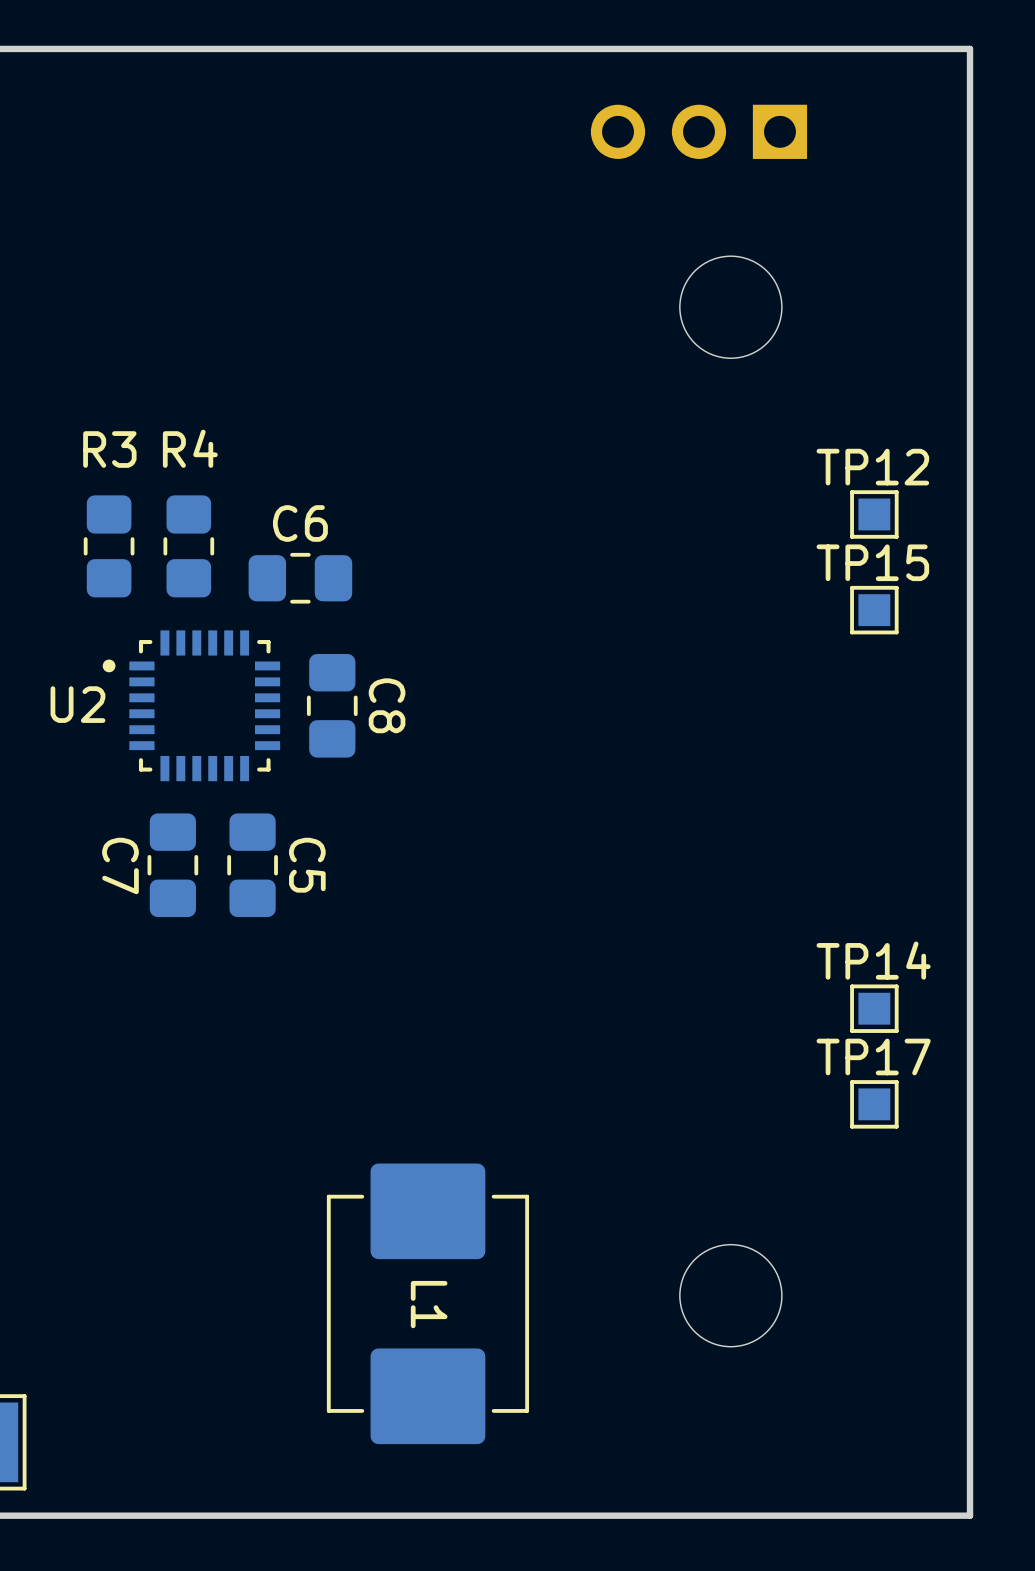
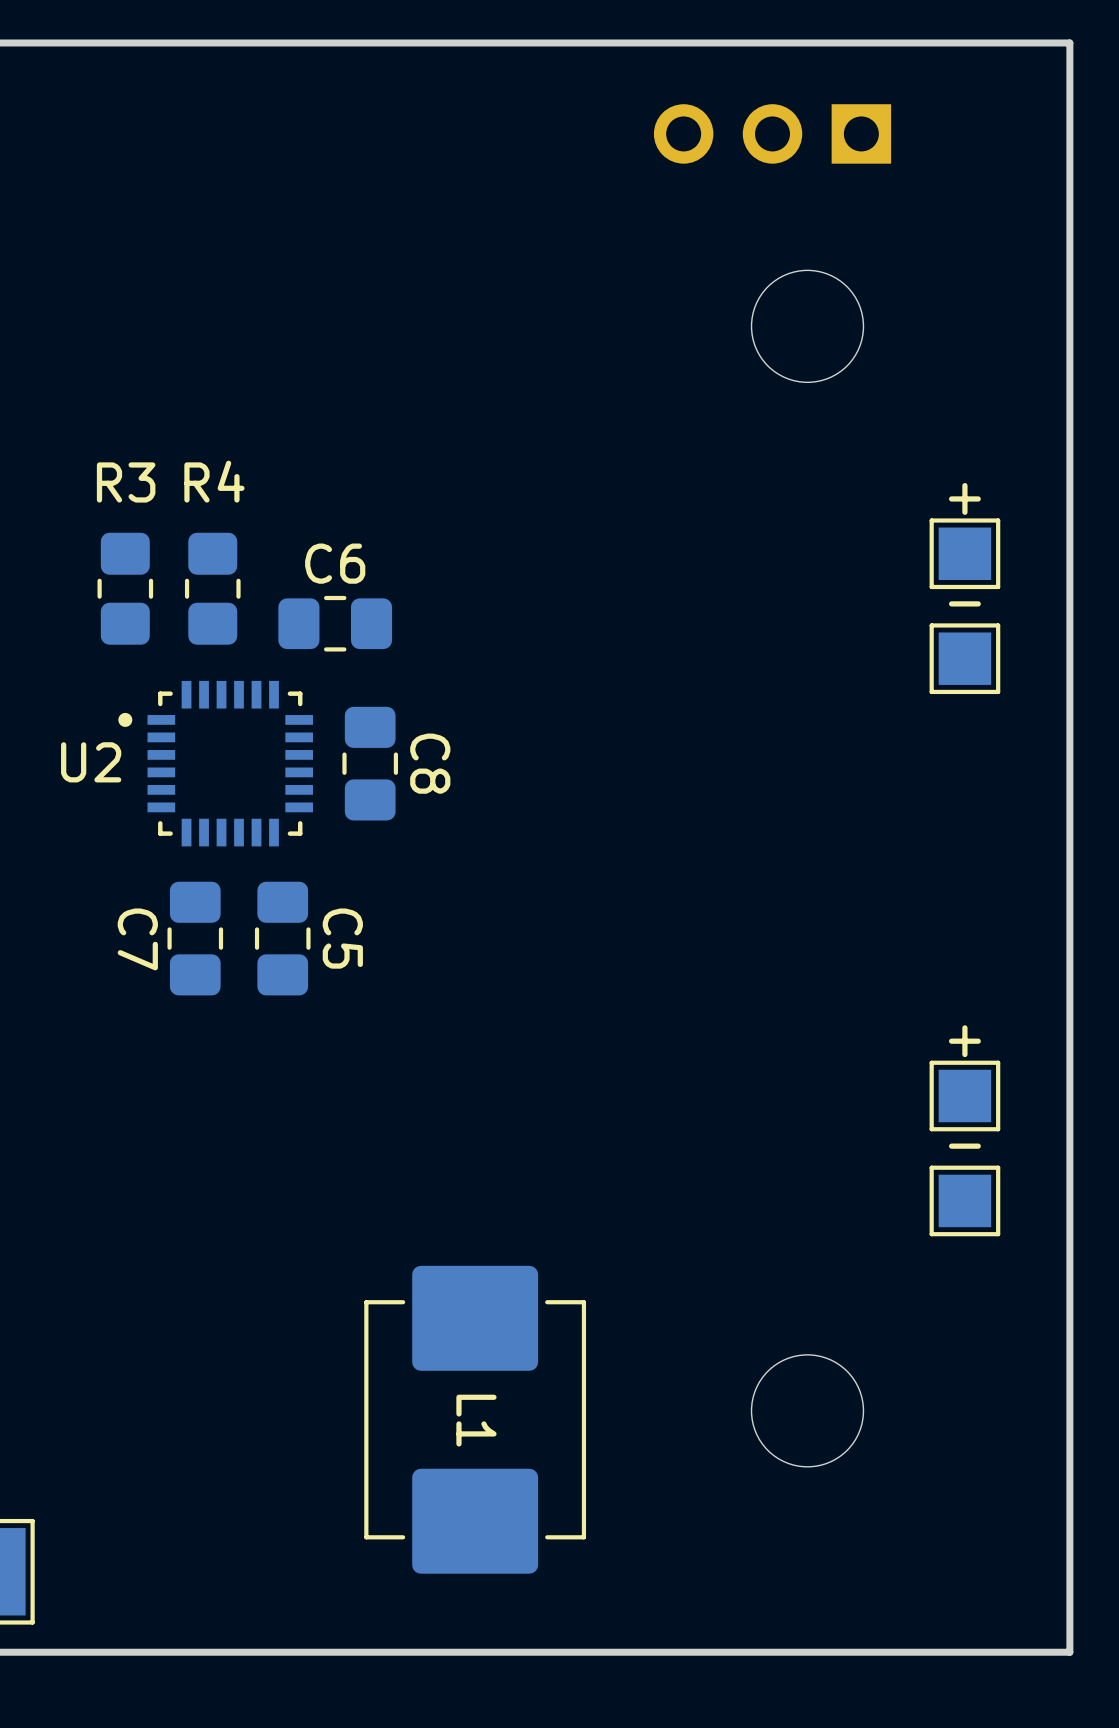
TP12: (874, 514) -> none
part: none -> (964, 553)
TP15: (874, 610) -> none
part: none -> (964, 658)
TP14: (874, 1008) -> none
part: none -> (964, 1095)
TP17: (874, 1104) -> none
part: none -> (964, 1200)

